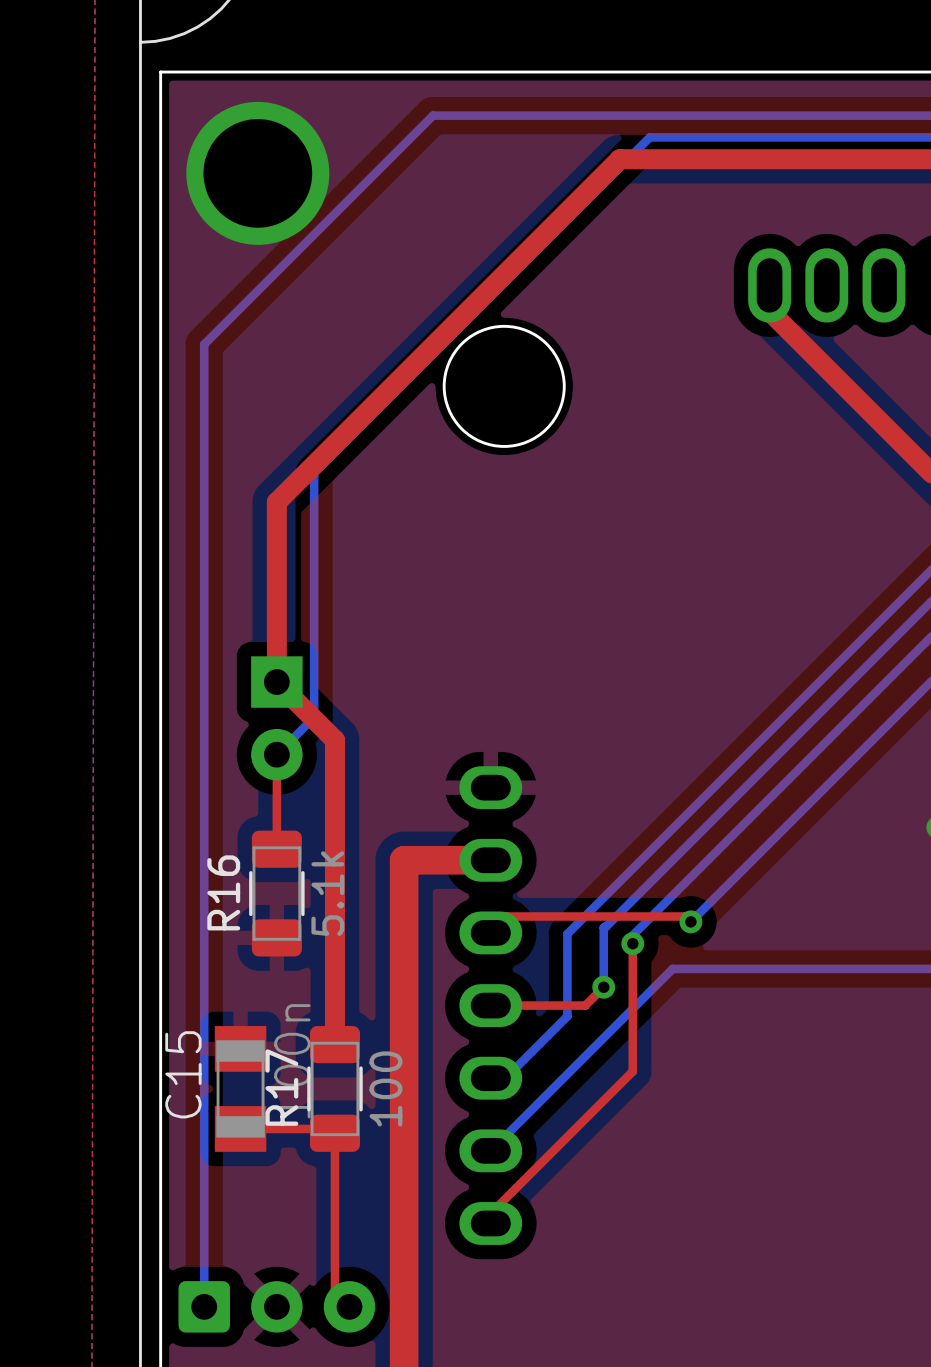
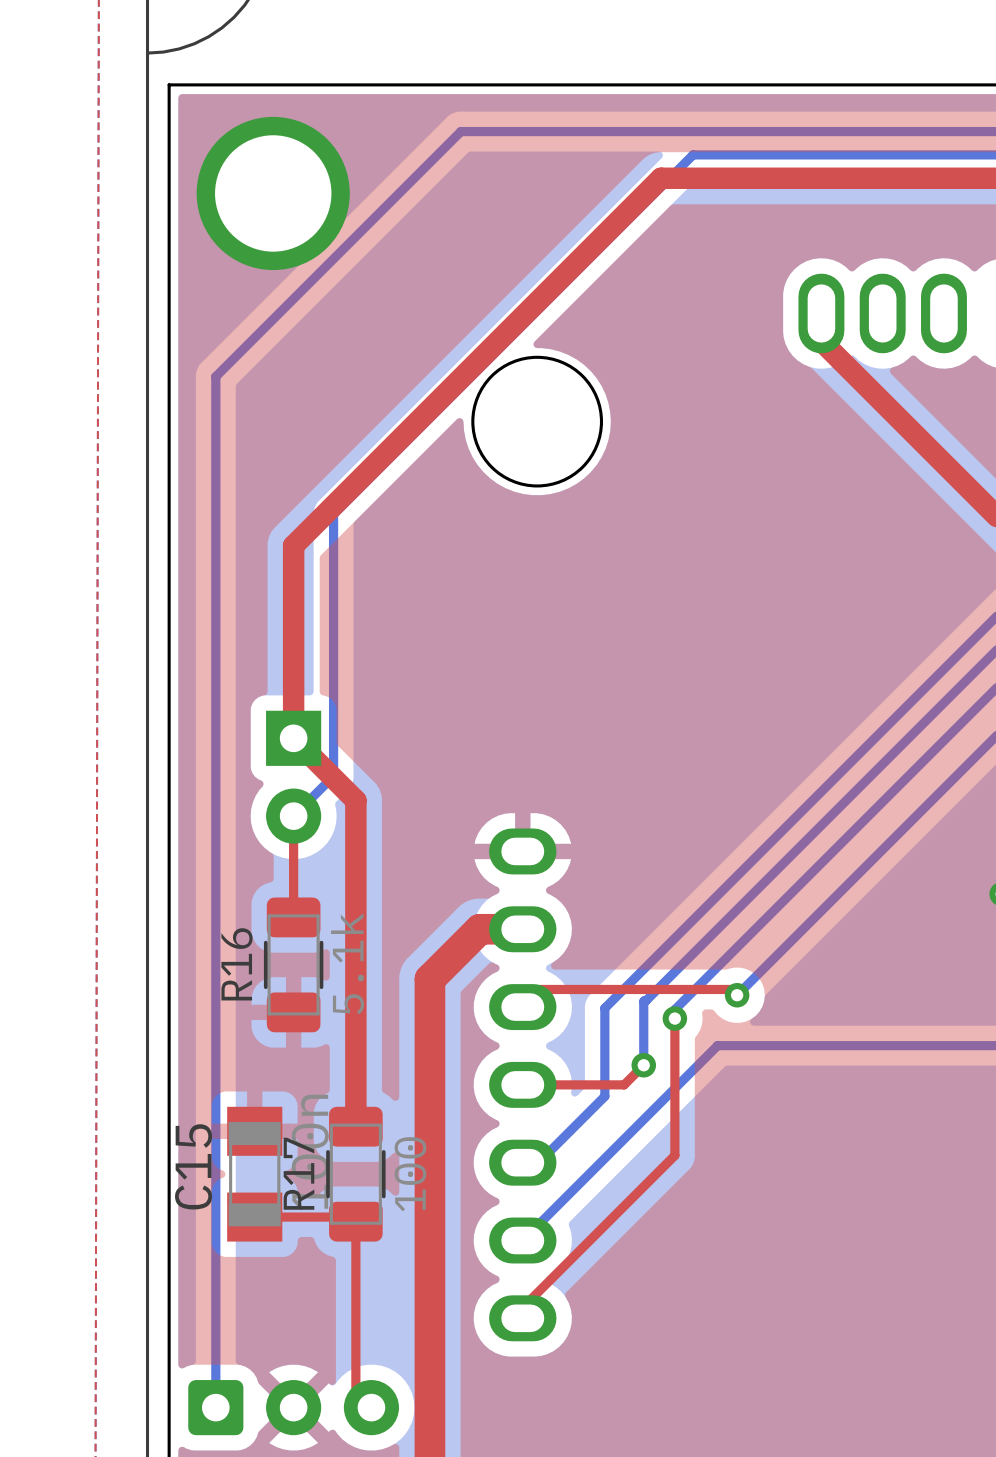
top track: (450, 860) (404, 860) (404, 906) -> (479, 929) (429, 979)

